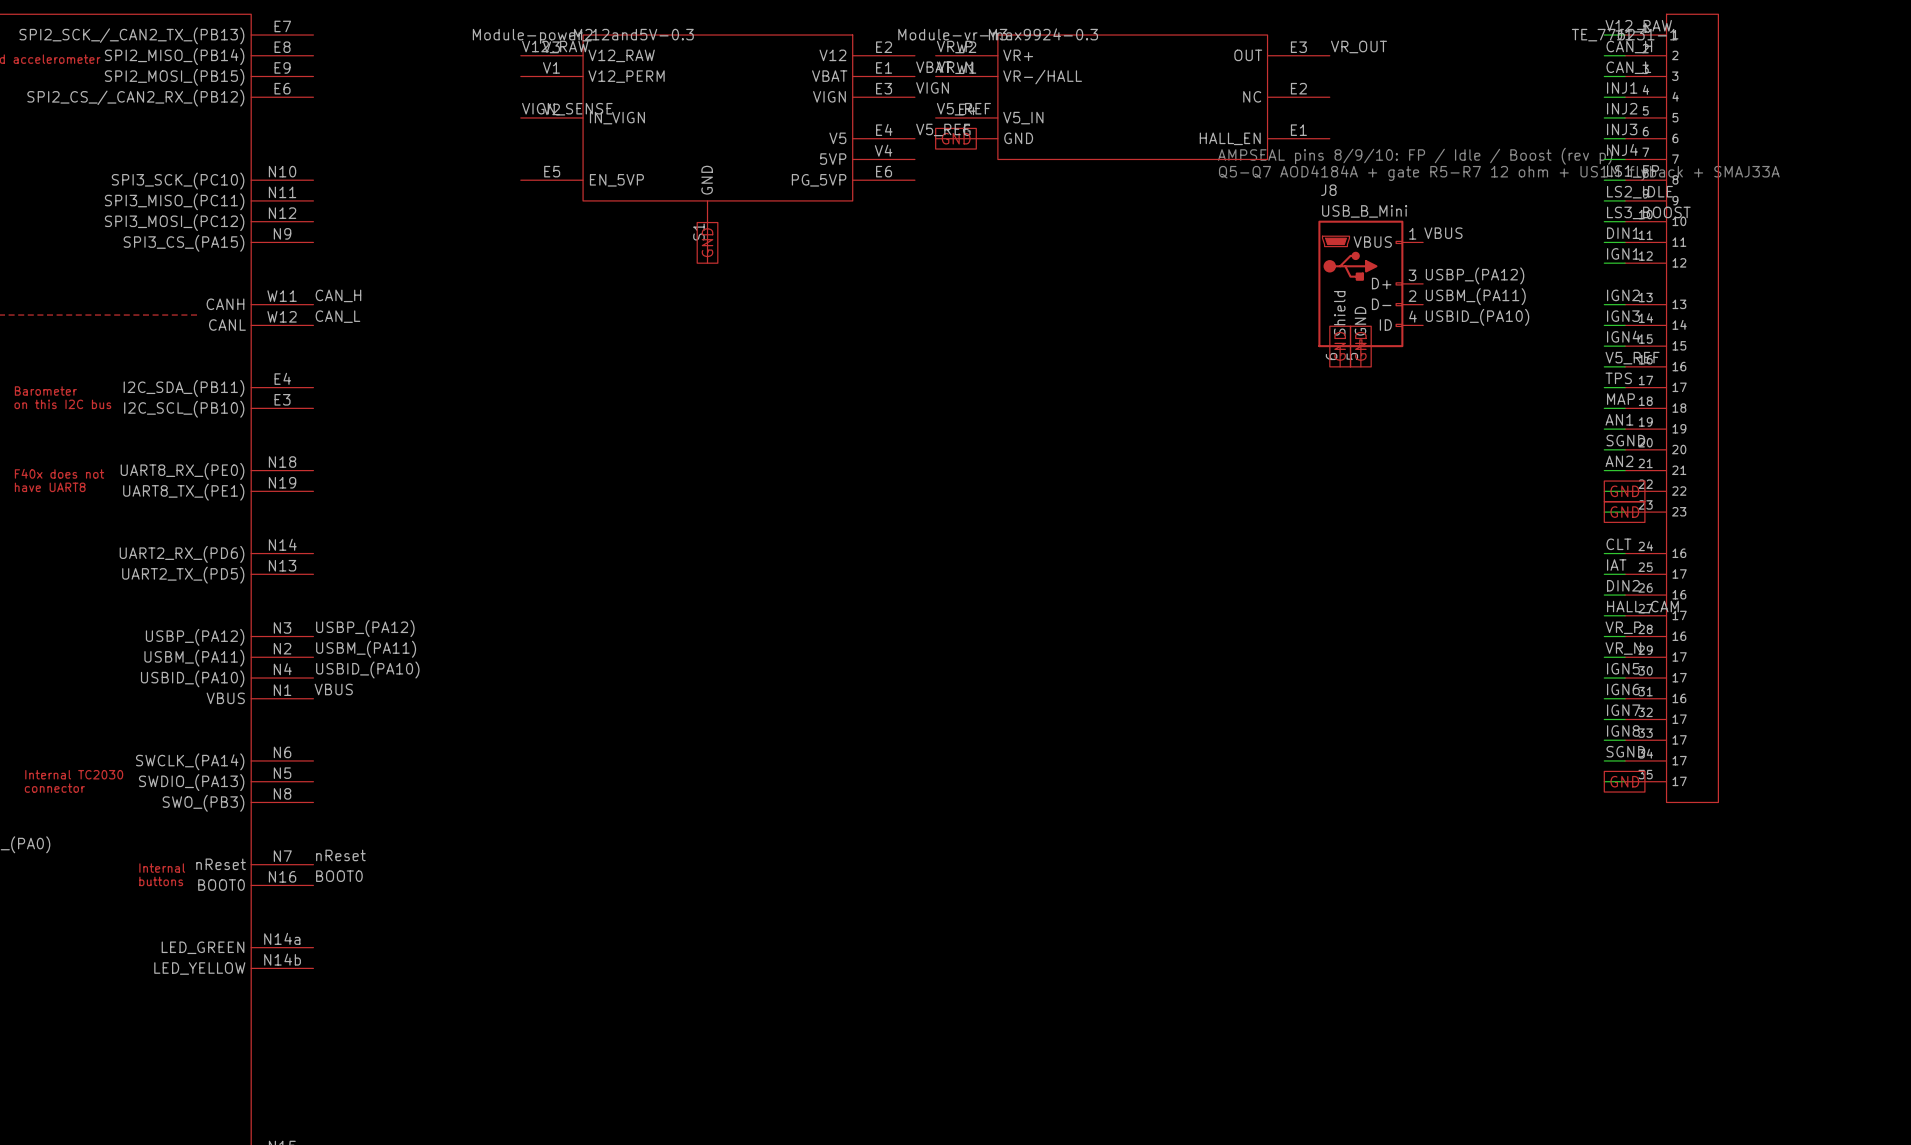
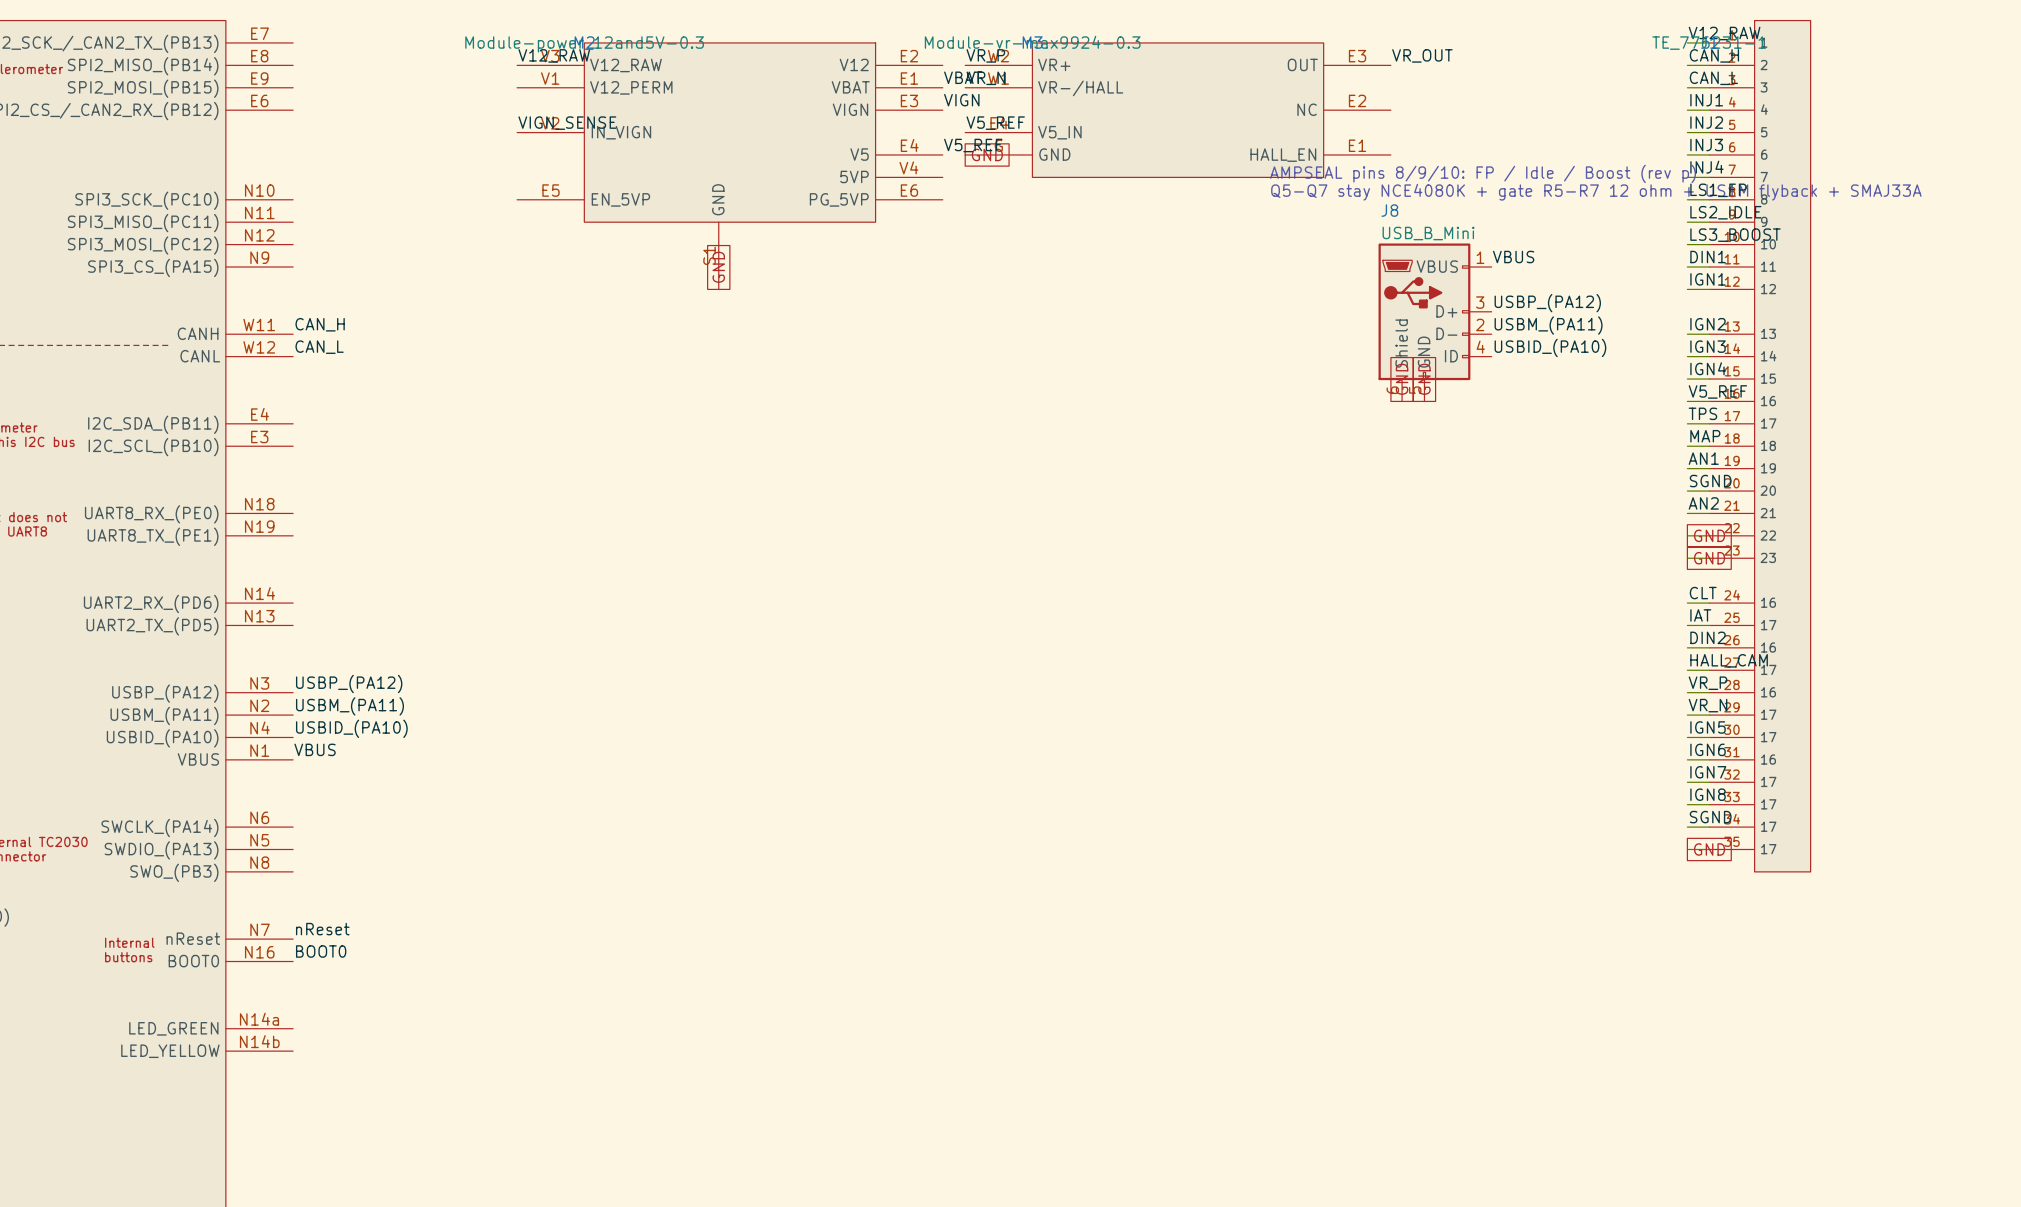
text: Q5-Q7 AOD4184A + gate R5-R7 12 ohm + US1M flyback + SMAJ33A (1499, 173) -> Q5-Q7 stay NCE4080K + gate R5-R7 12 ohm + US1M flyback + SMAJ33A (1596, 192)

